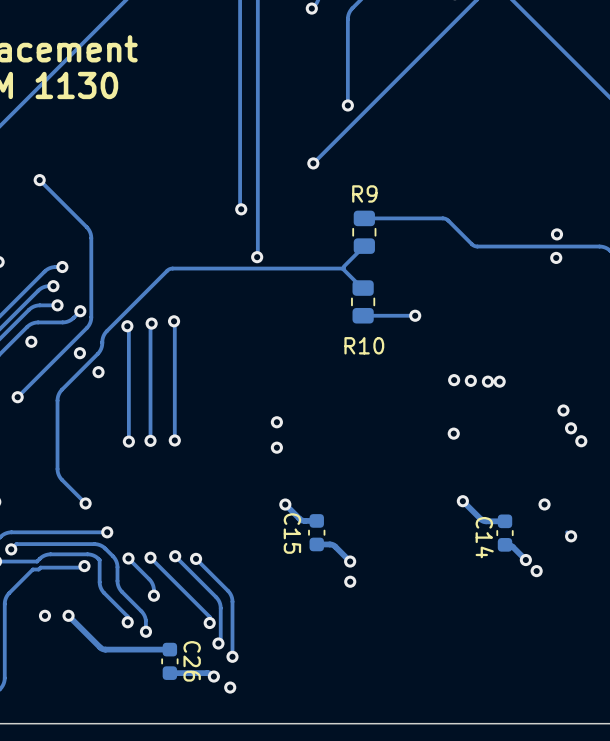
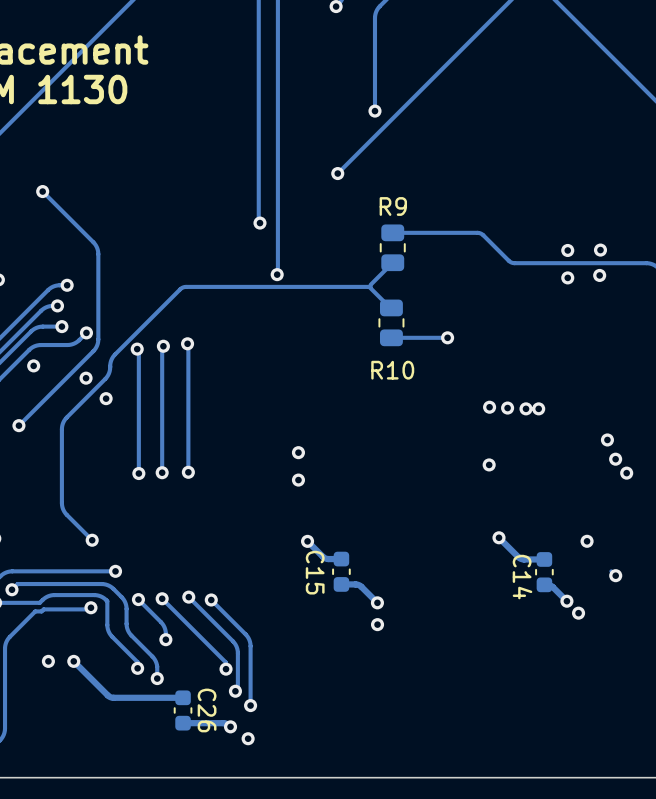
via: none -> (567, 250)
via: none -> (567, 277)

